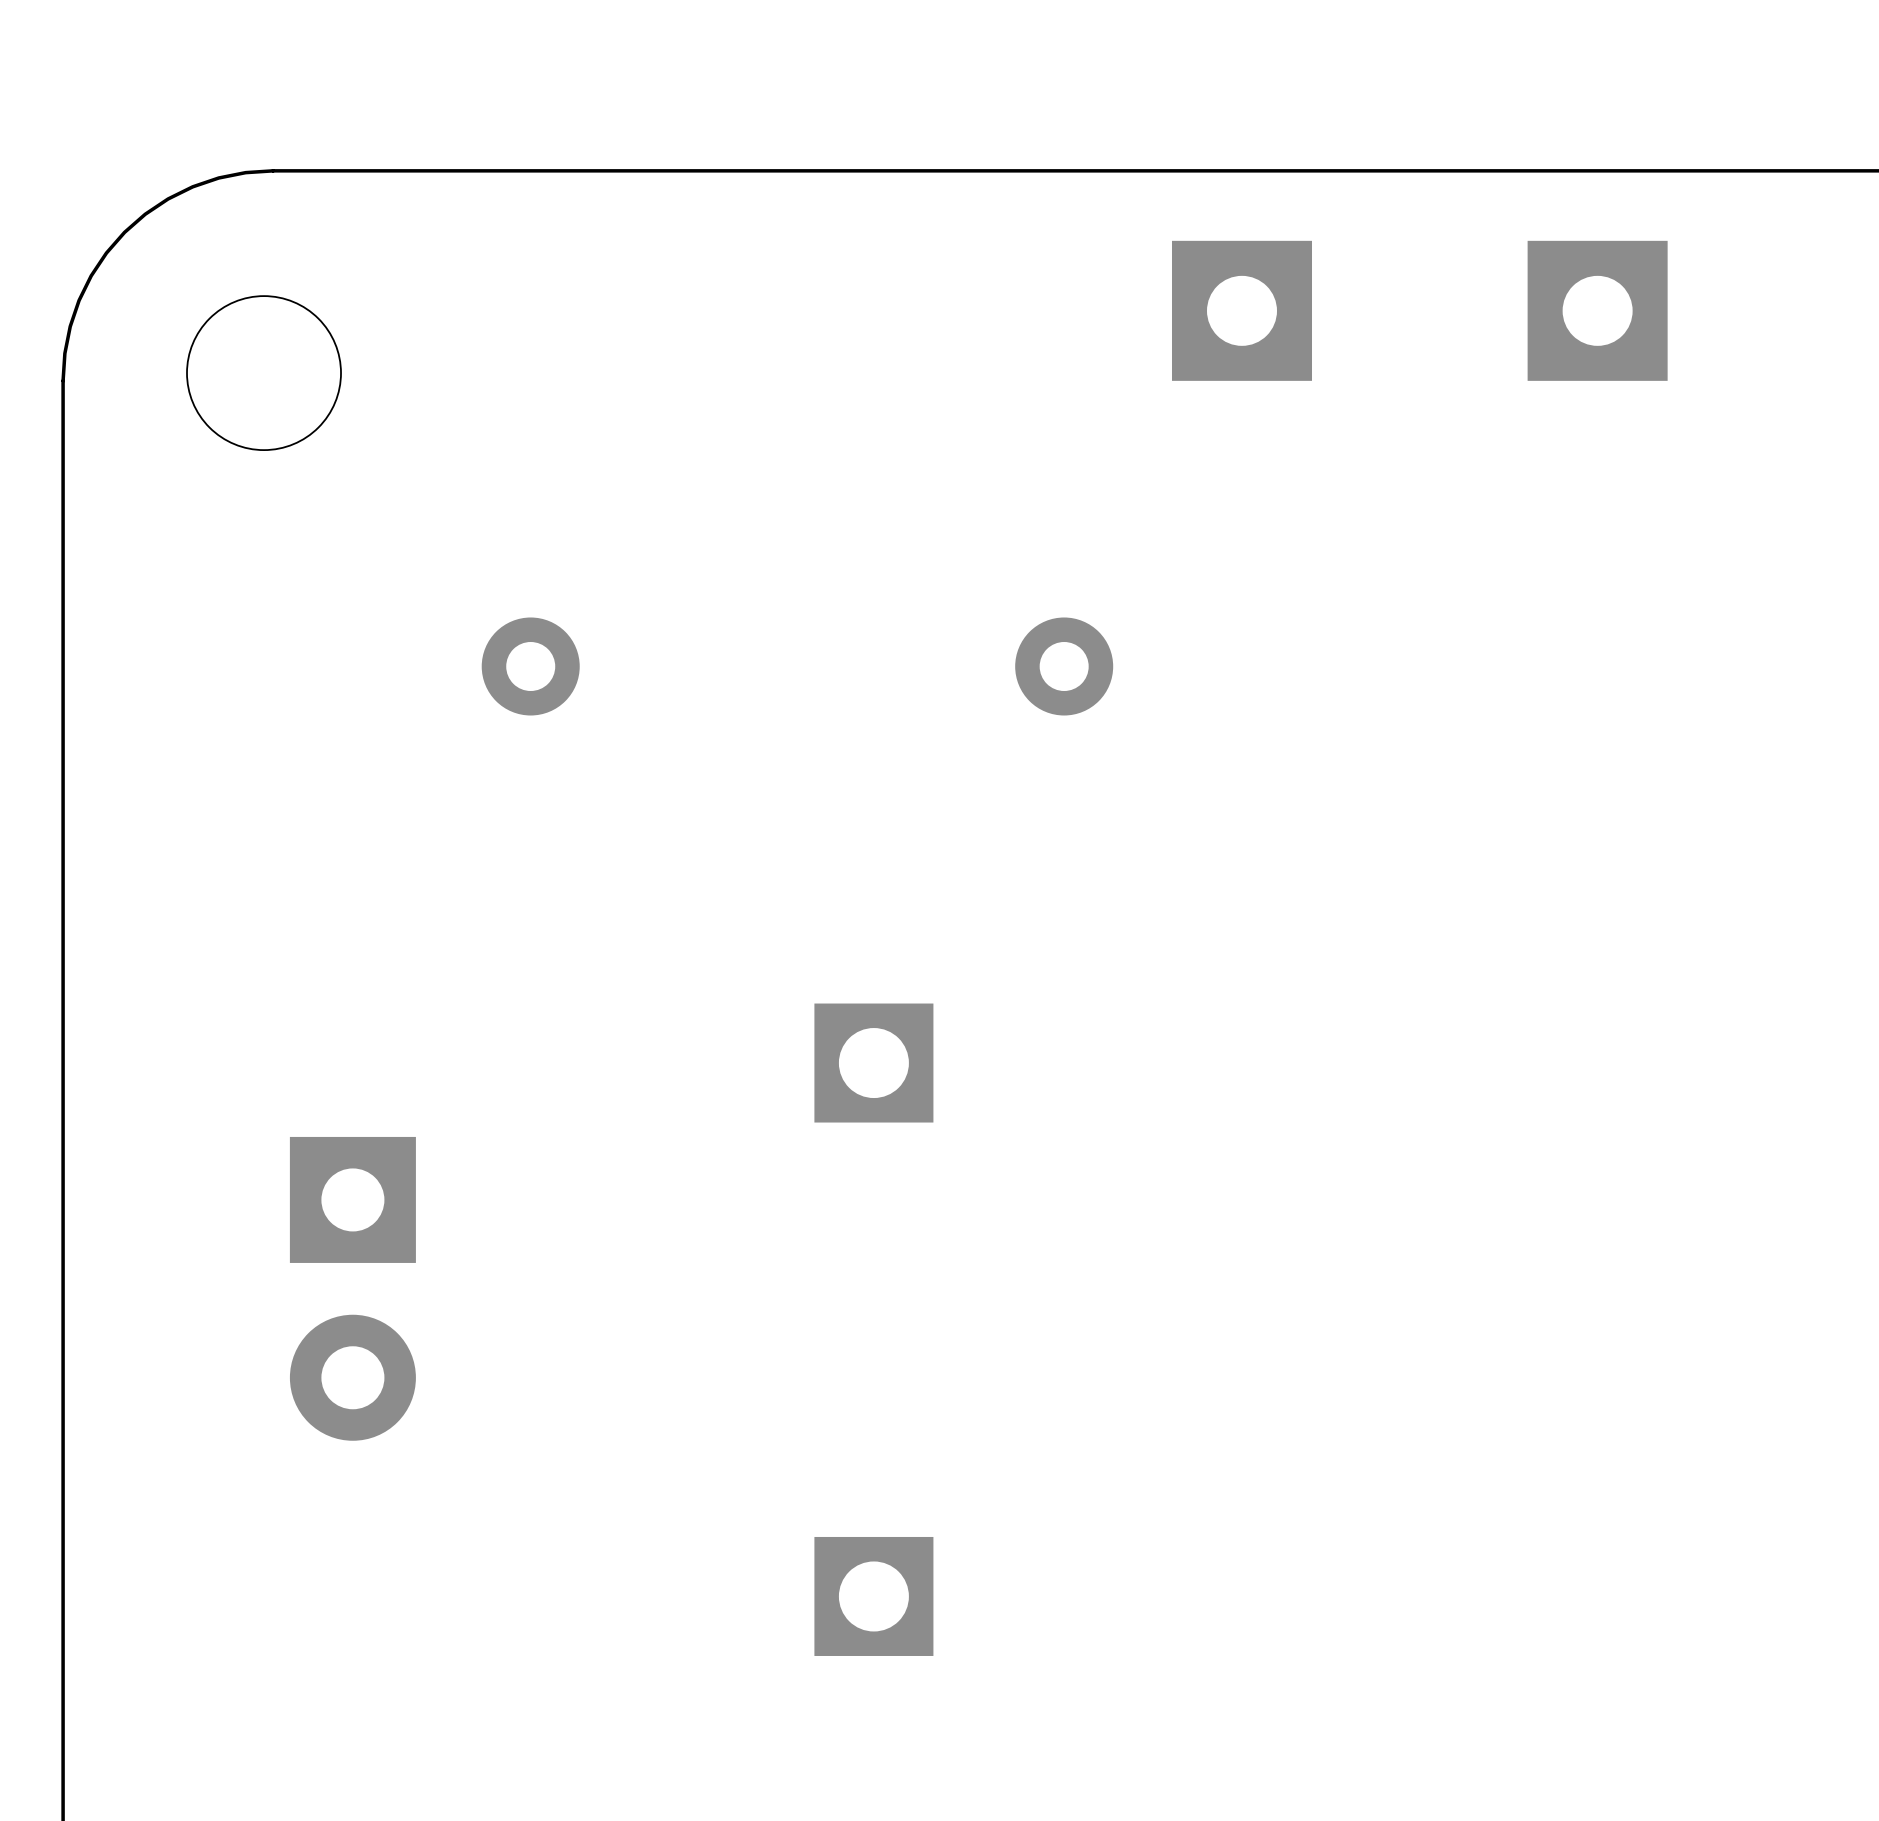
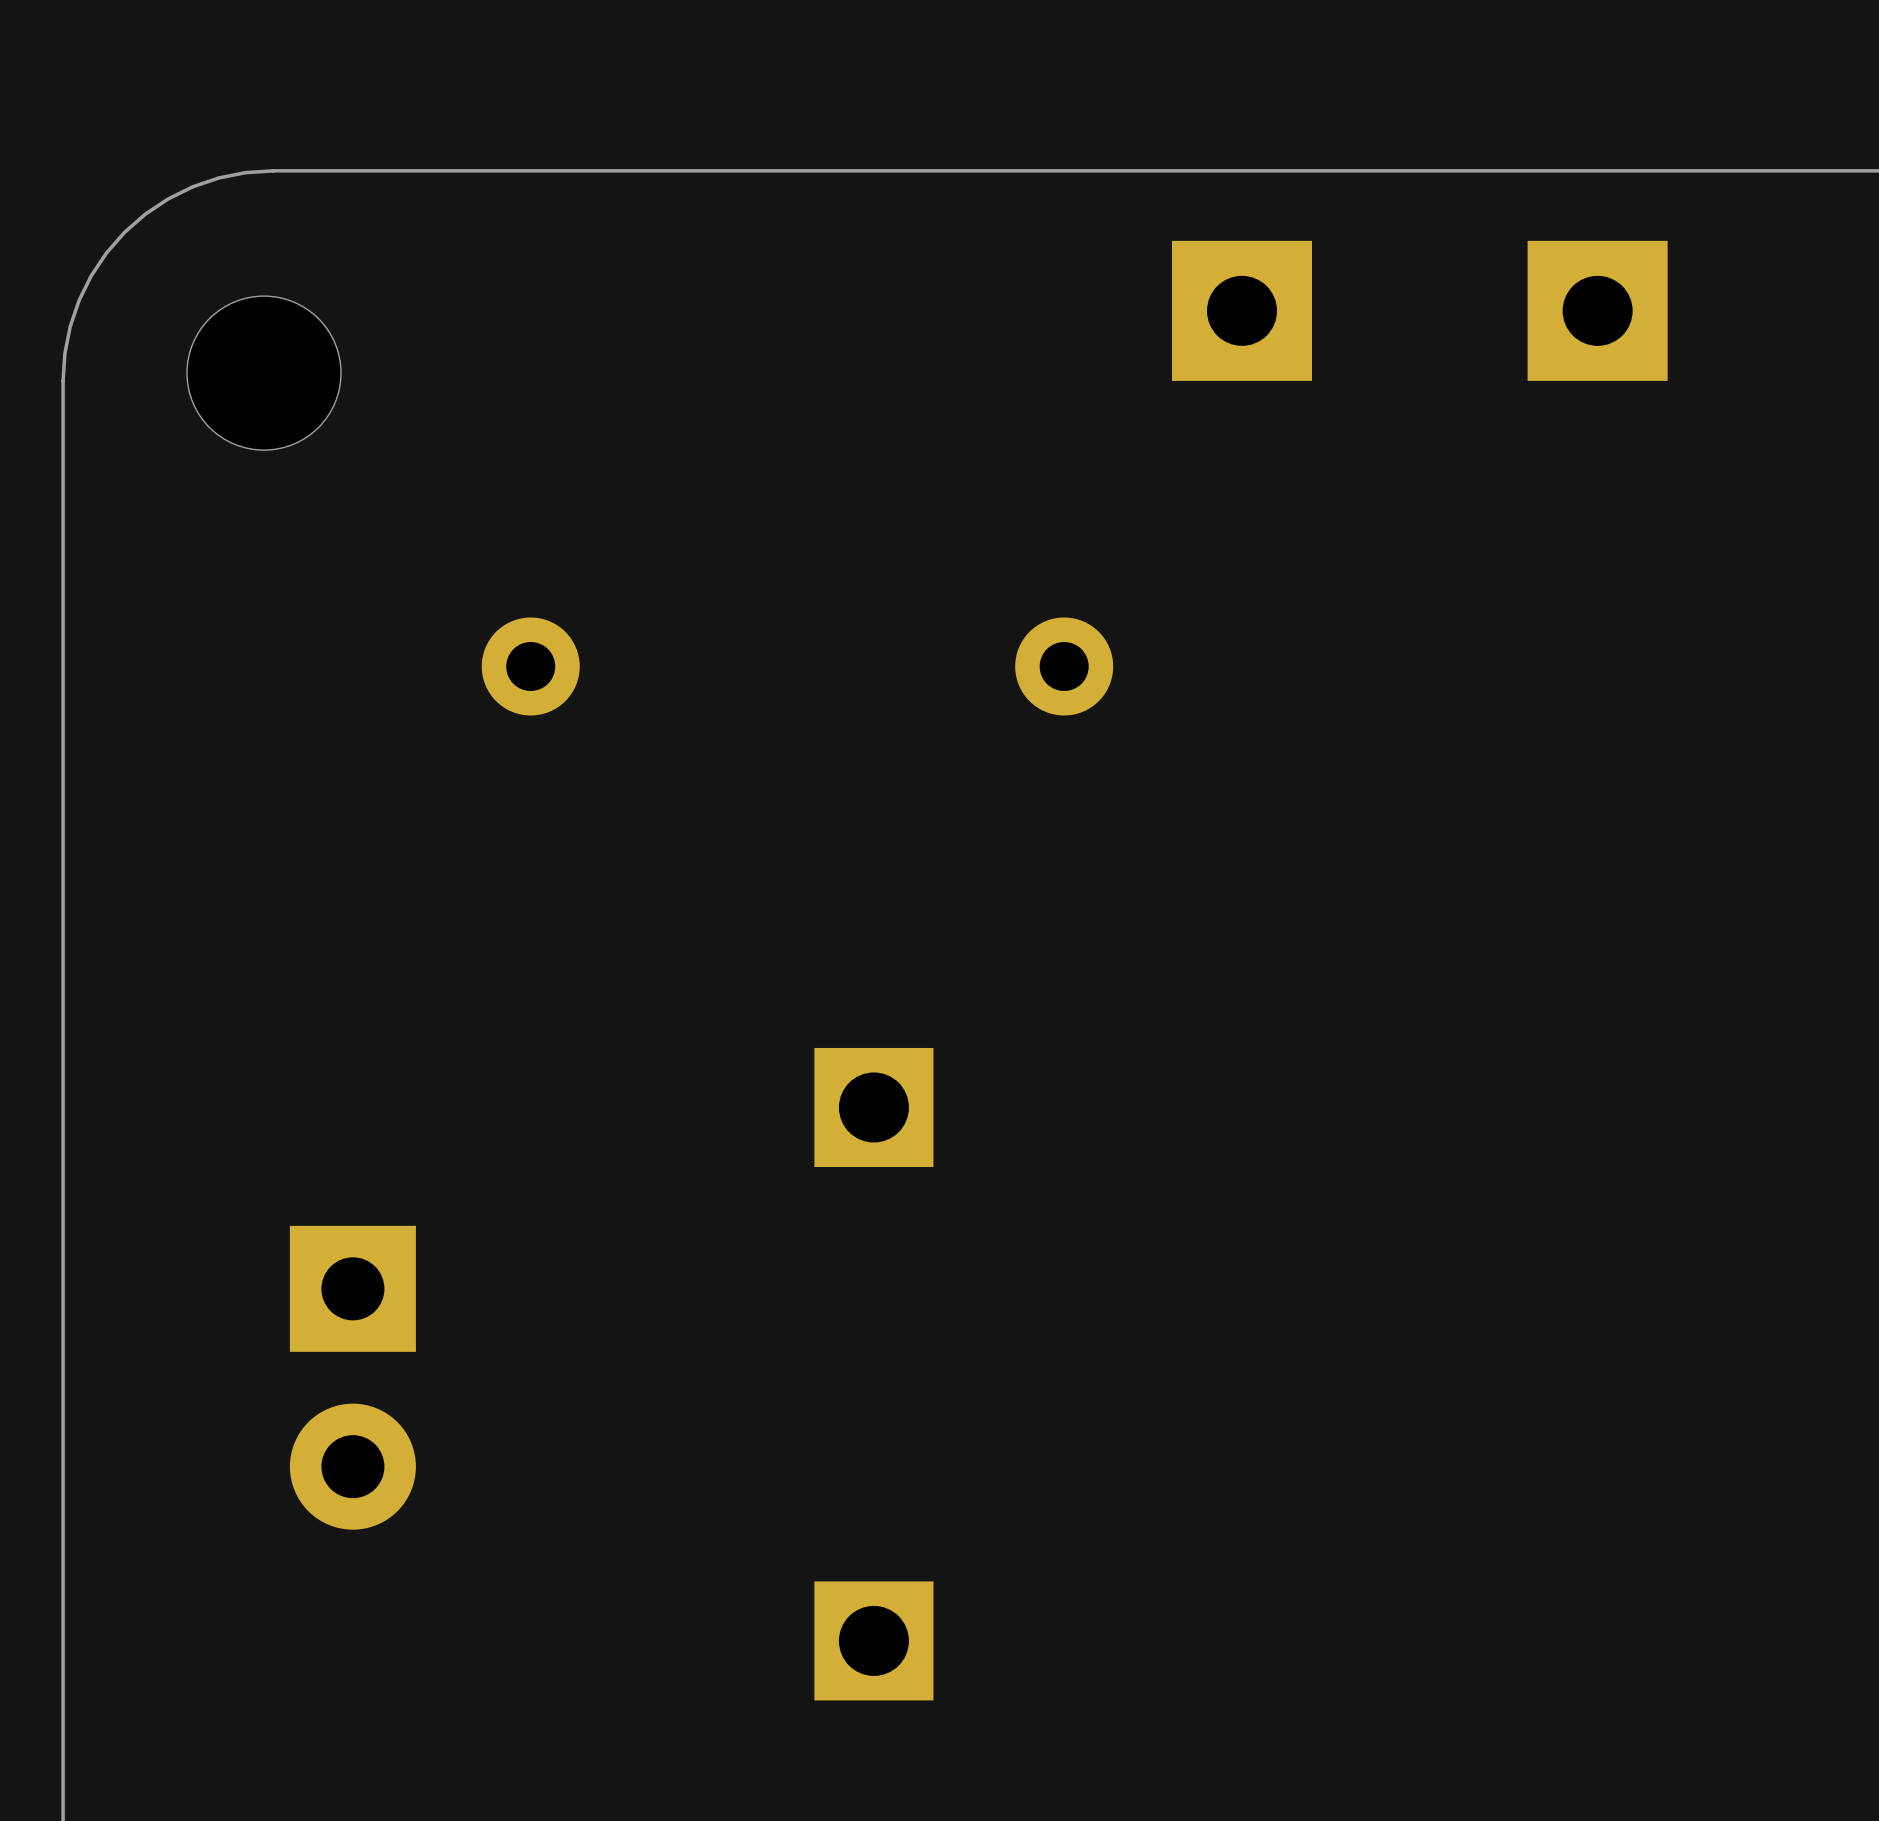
part position: (873, 1063) -> (873, 1107)
part position: (352, 1288) -> (352, 1377)
part position: (873, 1596) -> (873, 1640)

